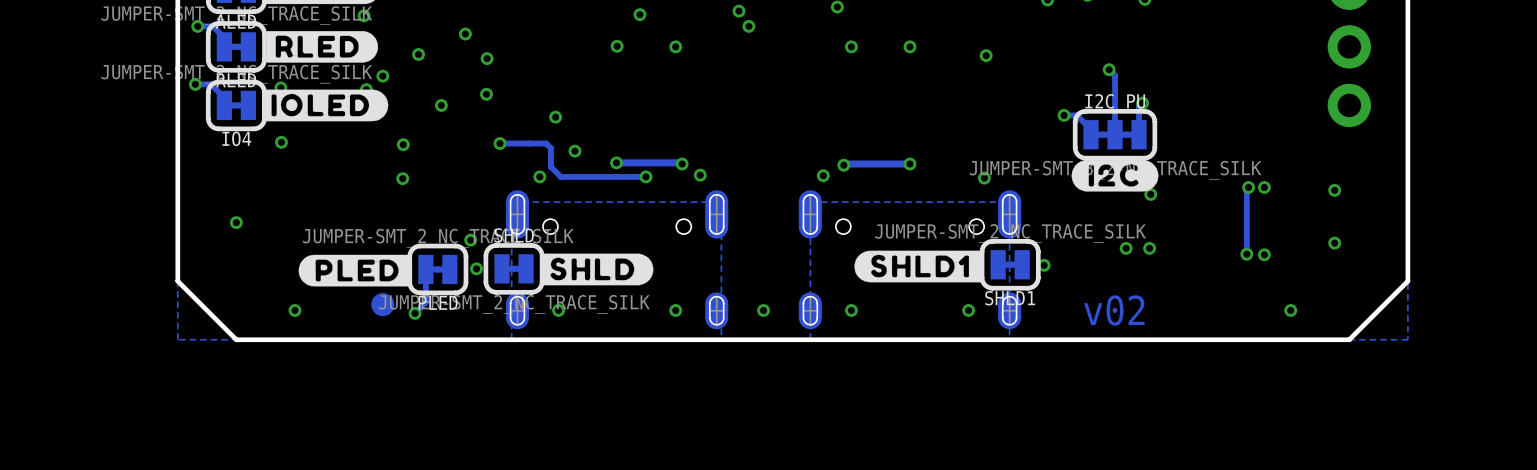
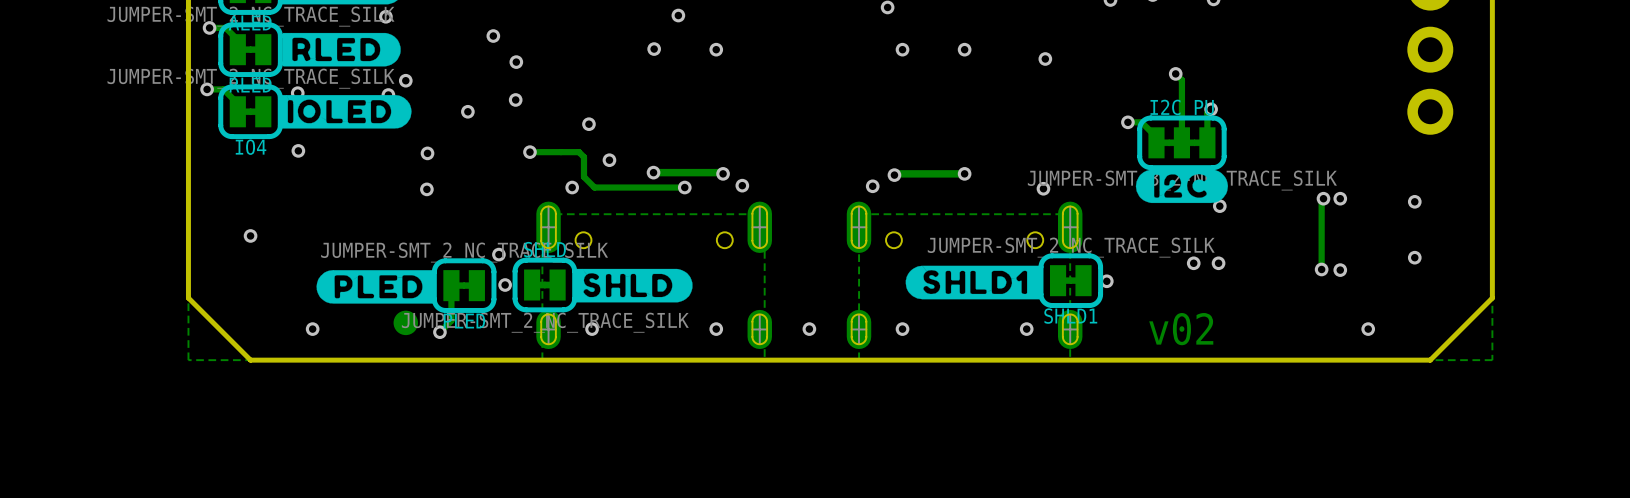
via: (738, 11) -> none
via: (748, 26) -> none
via: (418, 54) -> none

